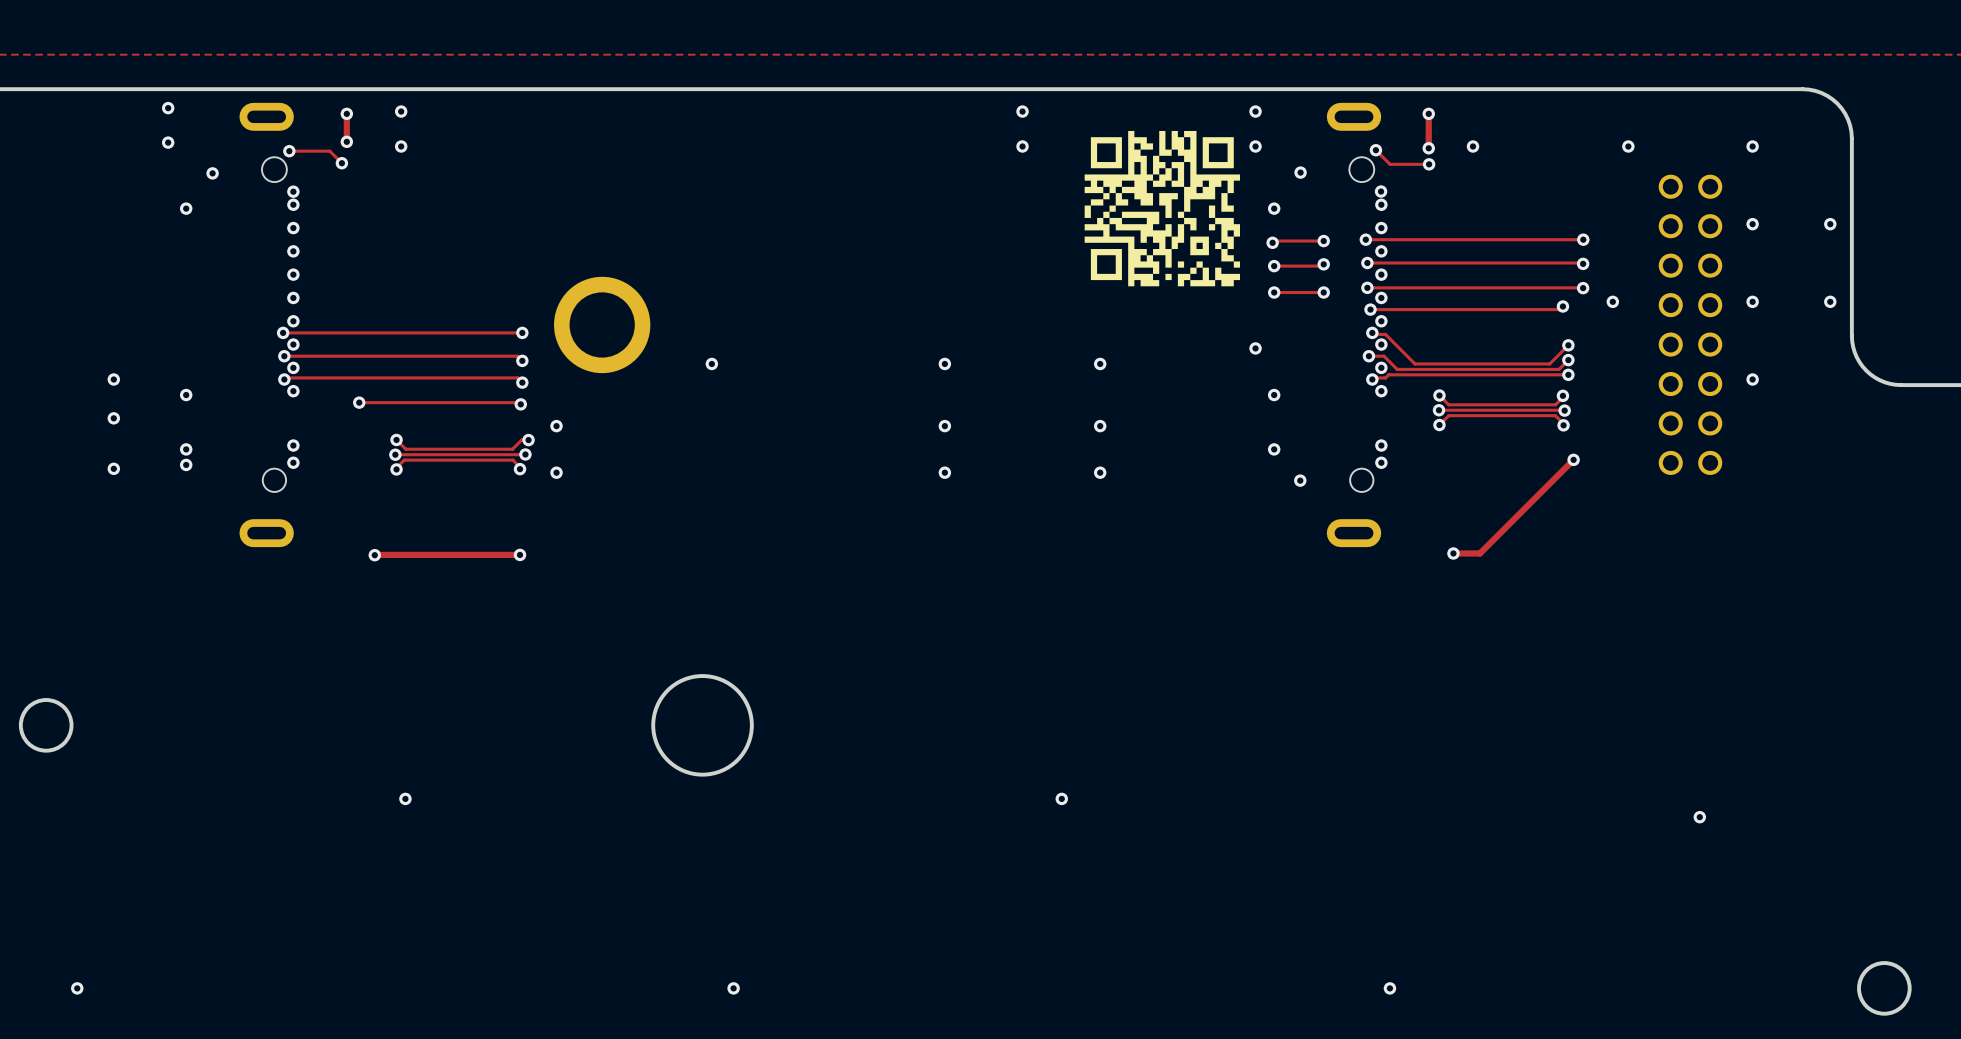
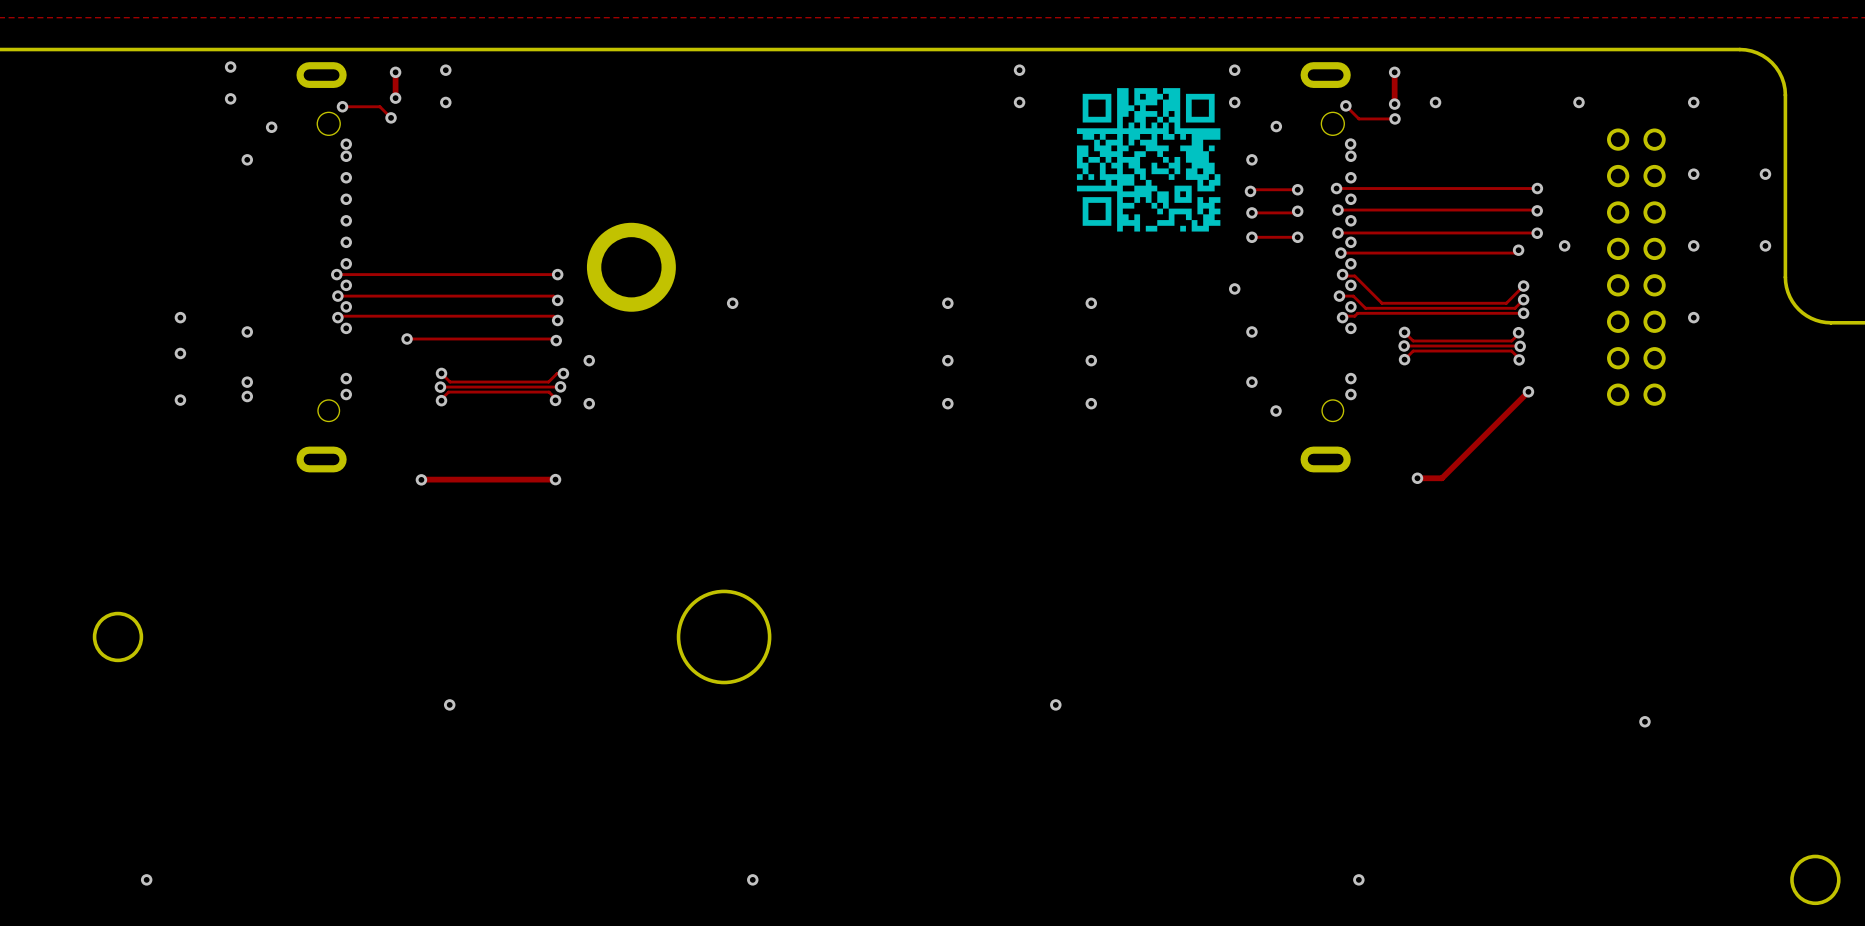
drawing shape: [1084, 130, 1241, 287] -> [1076, 88, 1221, 232]

